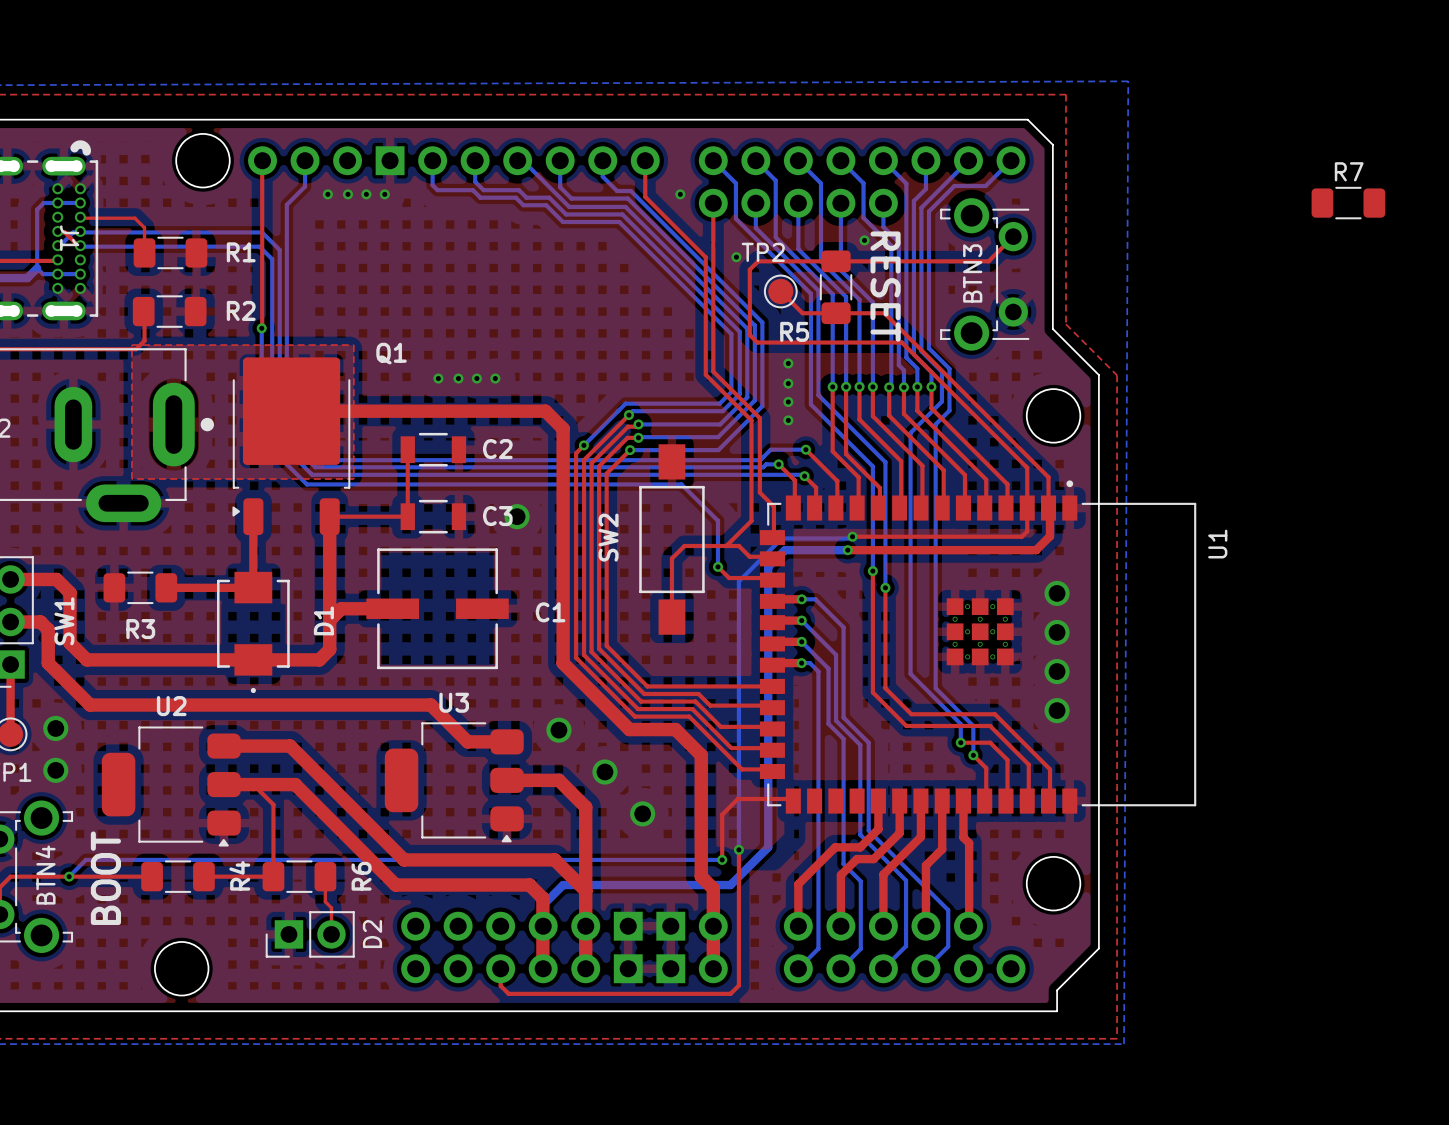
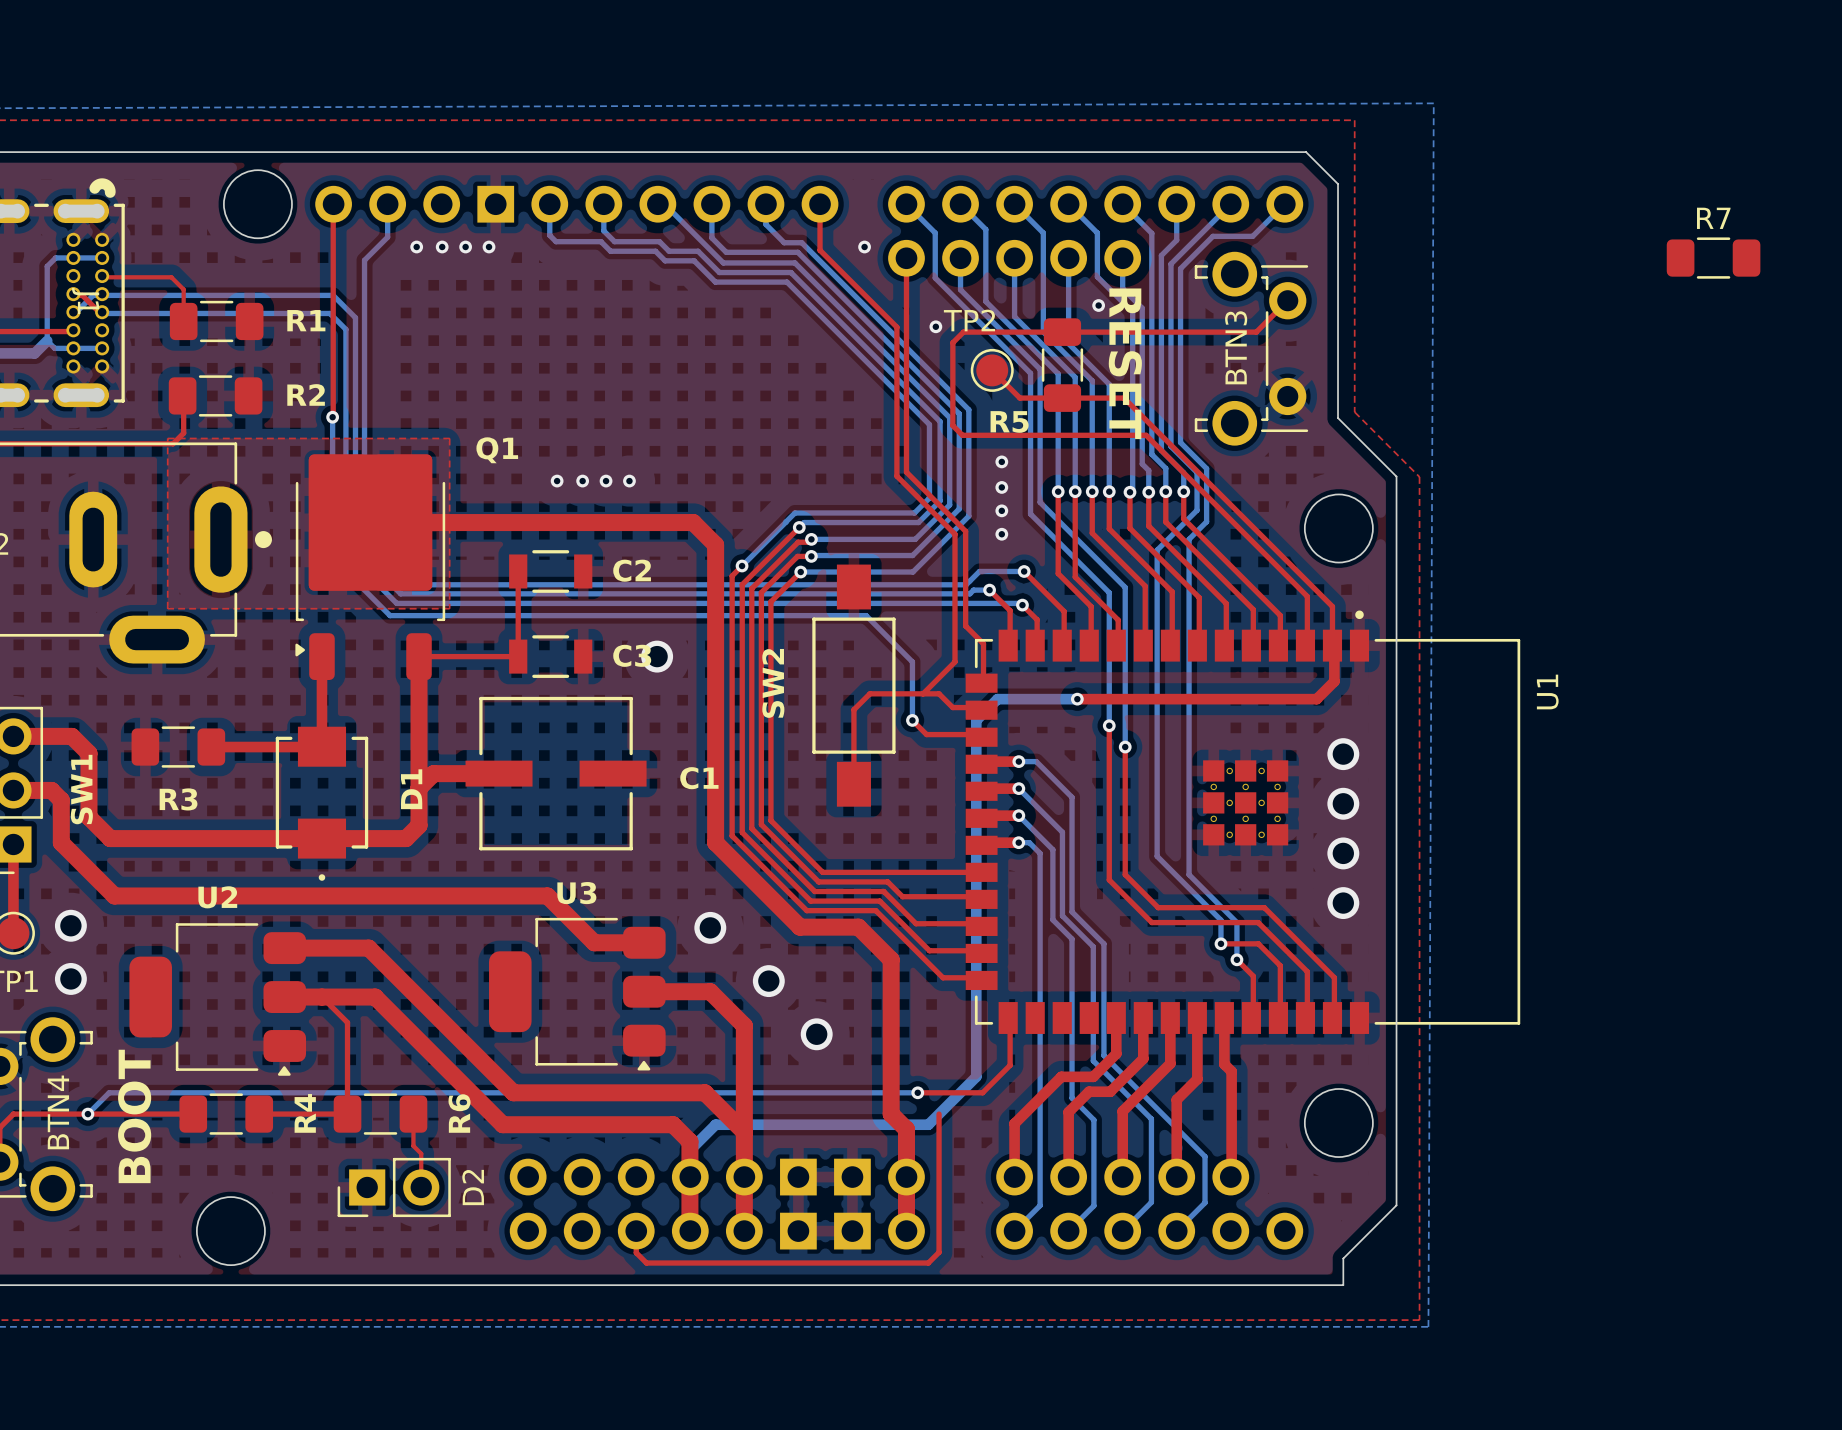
top track: (1027, 467) (1027, 531) (1021, 536) (852, 536) -> (1305, 594) (1307, 596) (1307, 642)
bottom track: (852, 536) (851, 538) (781, 538) (738, 581) (738, 849) -> none
via: (852, 536) -> none
top track: (794, 798) (737, 798) (722, 814) (722, 859) -> (1010, 1015) (1010, 1065) (982, 1092) (917, 1092)
top track: (738, 849) (738, 876) -> none
via: (738, 849) -> none

